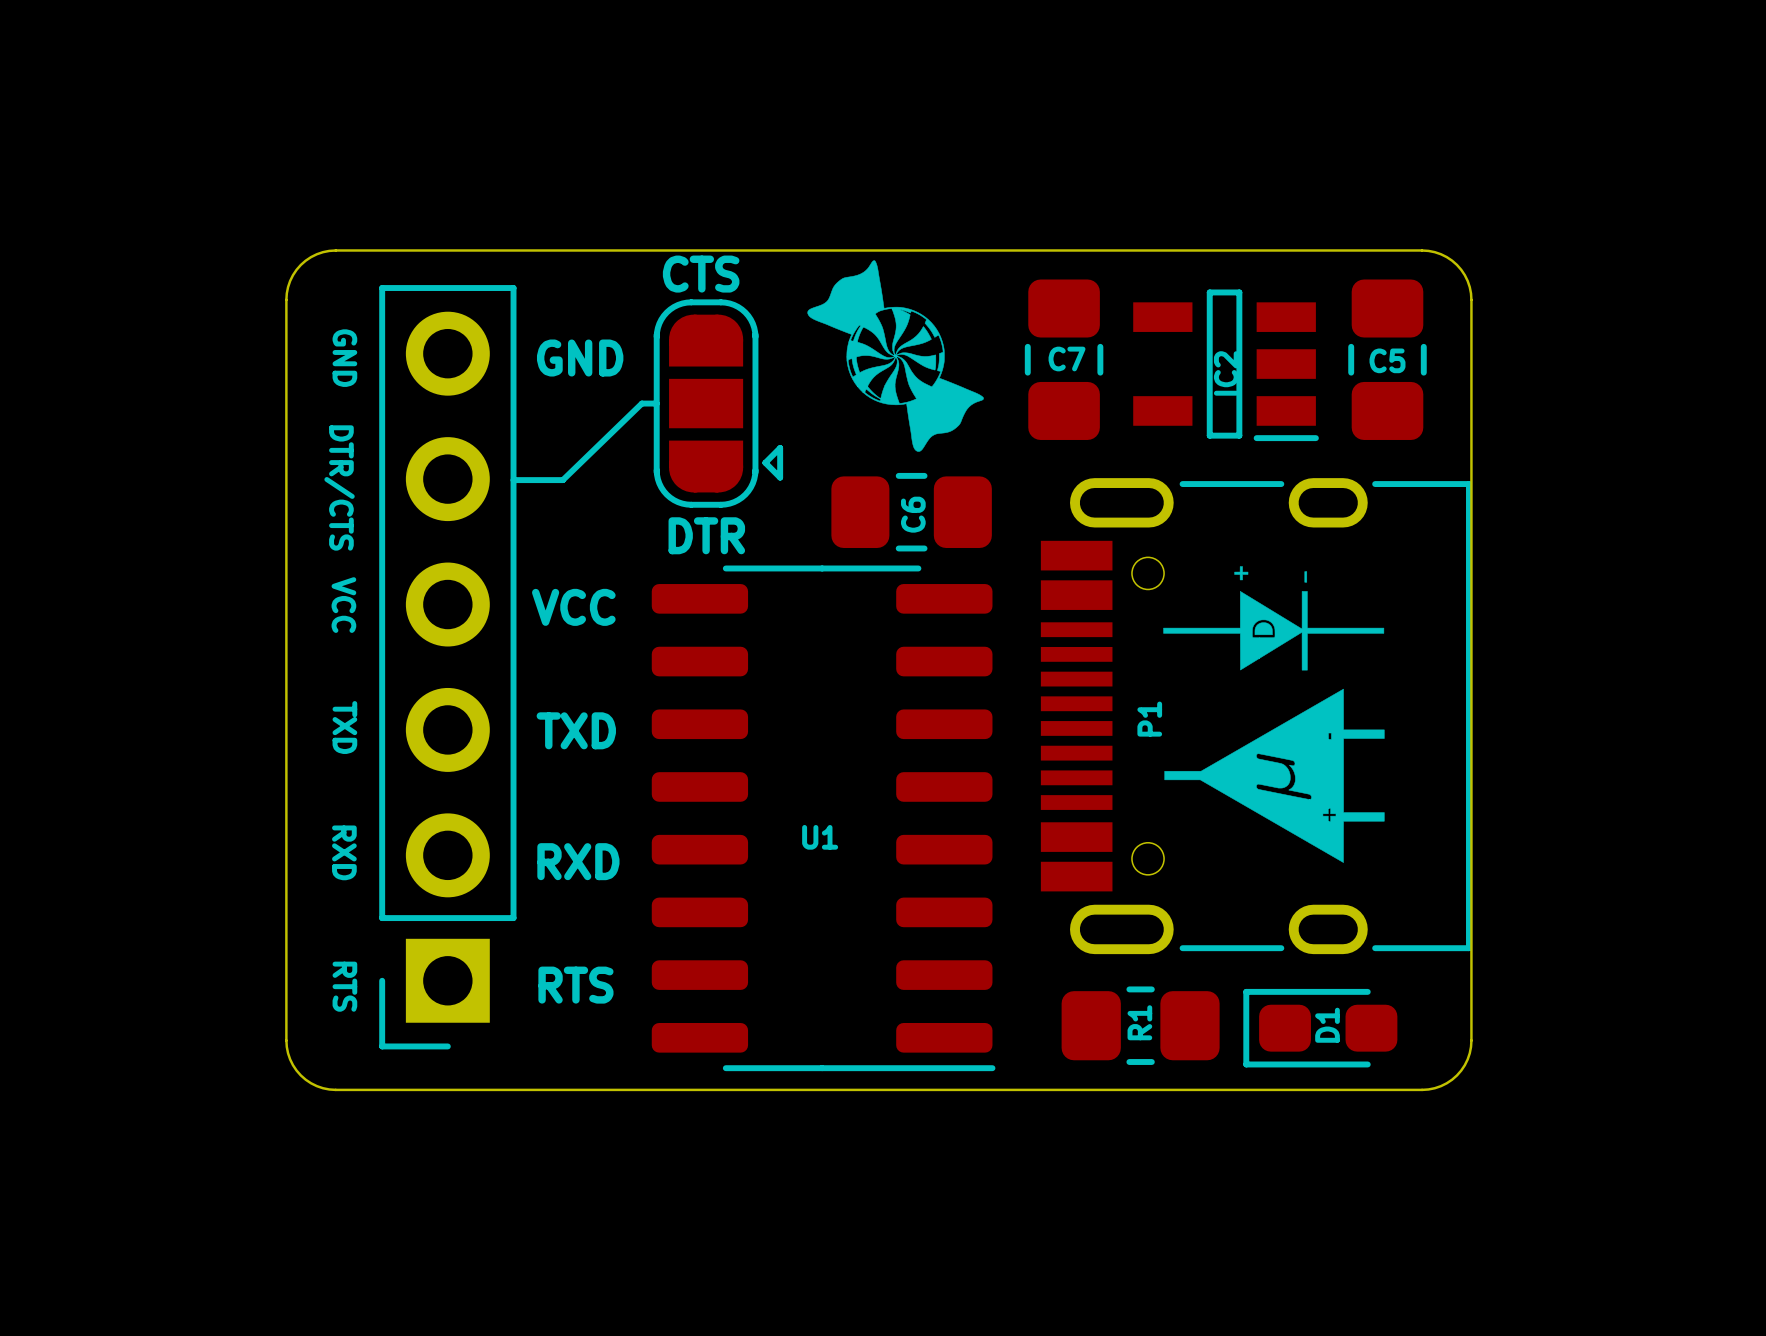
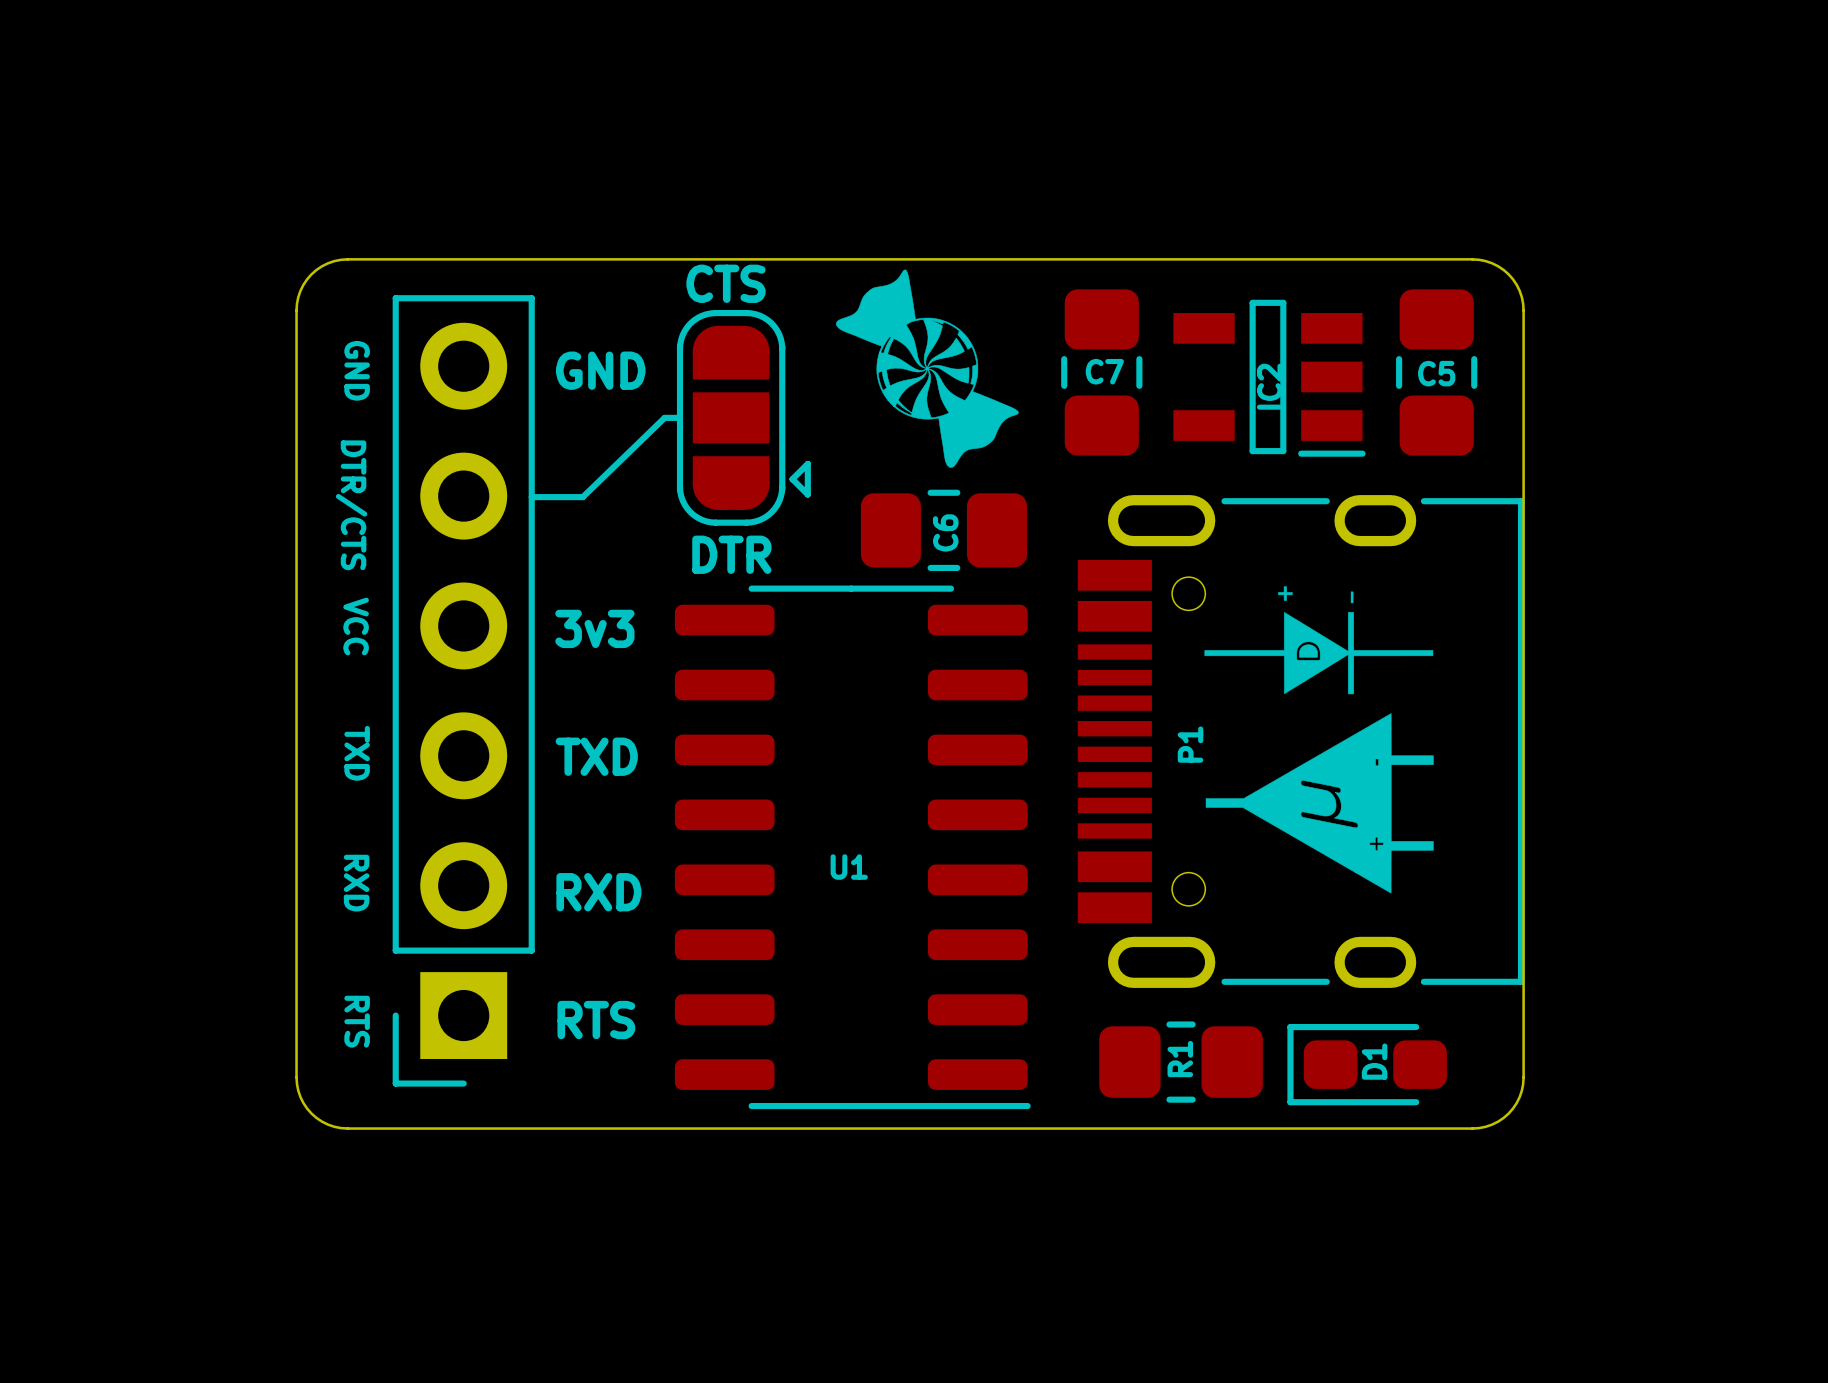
text: VCC (573, 607) -> 3v3 (594, 628)

